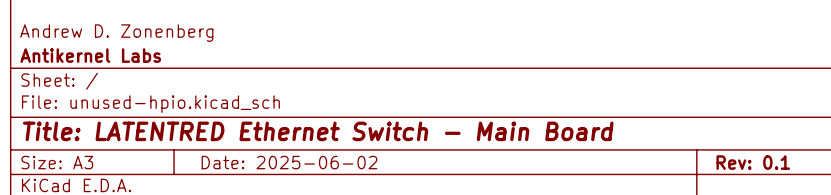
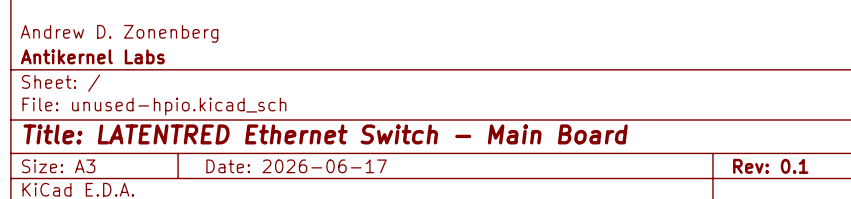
title block: Date: 2025-06-02 (289, 162) -> Date: 2026-06-17 (296, 166)

